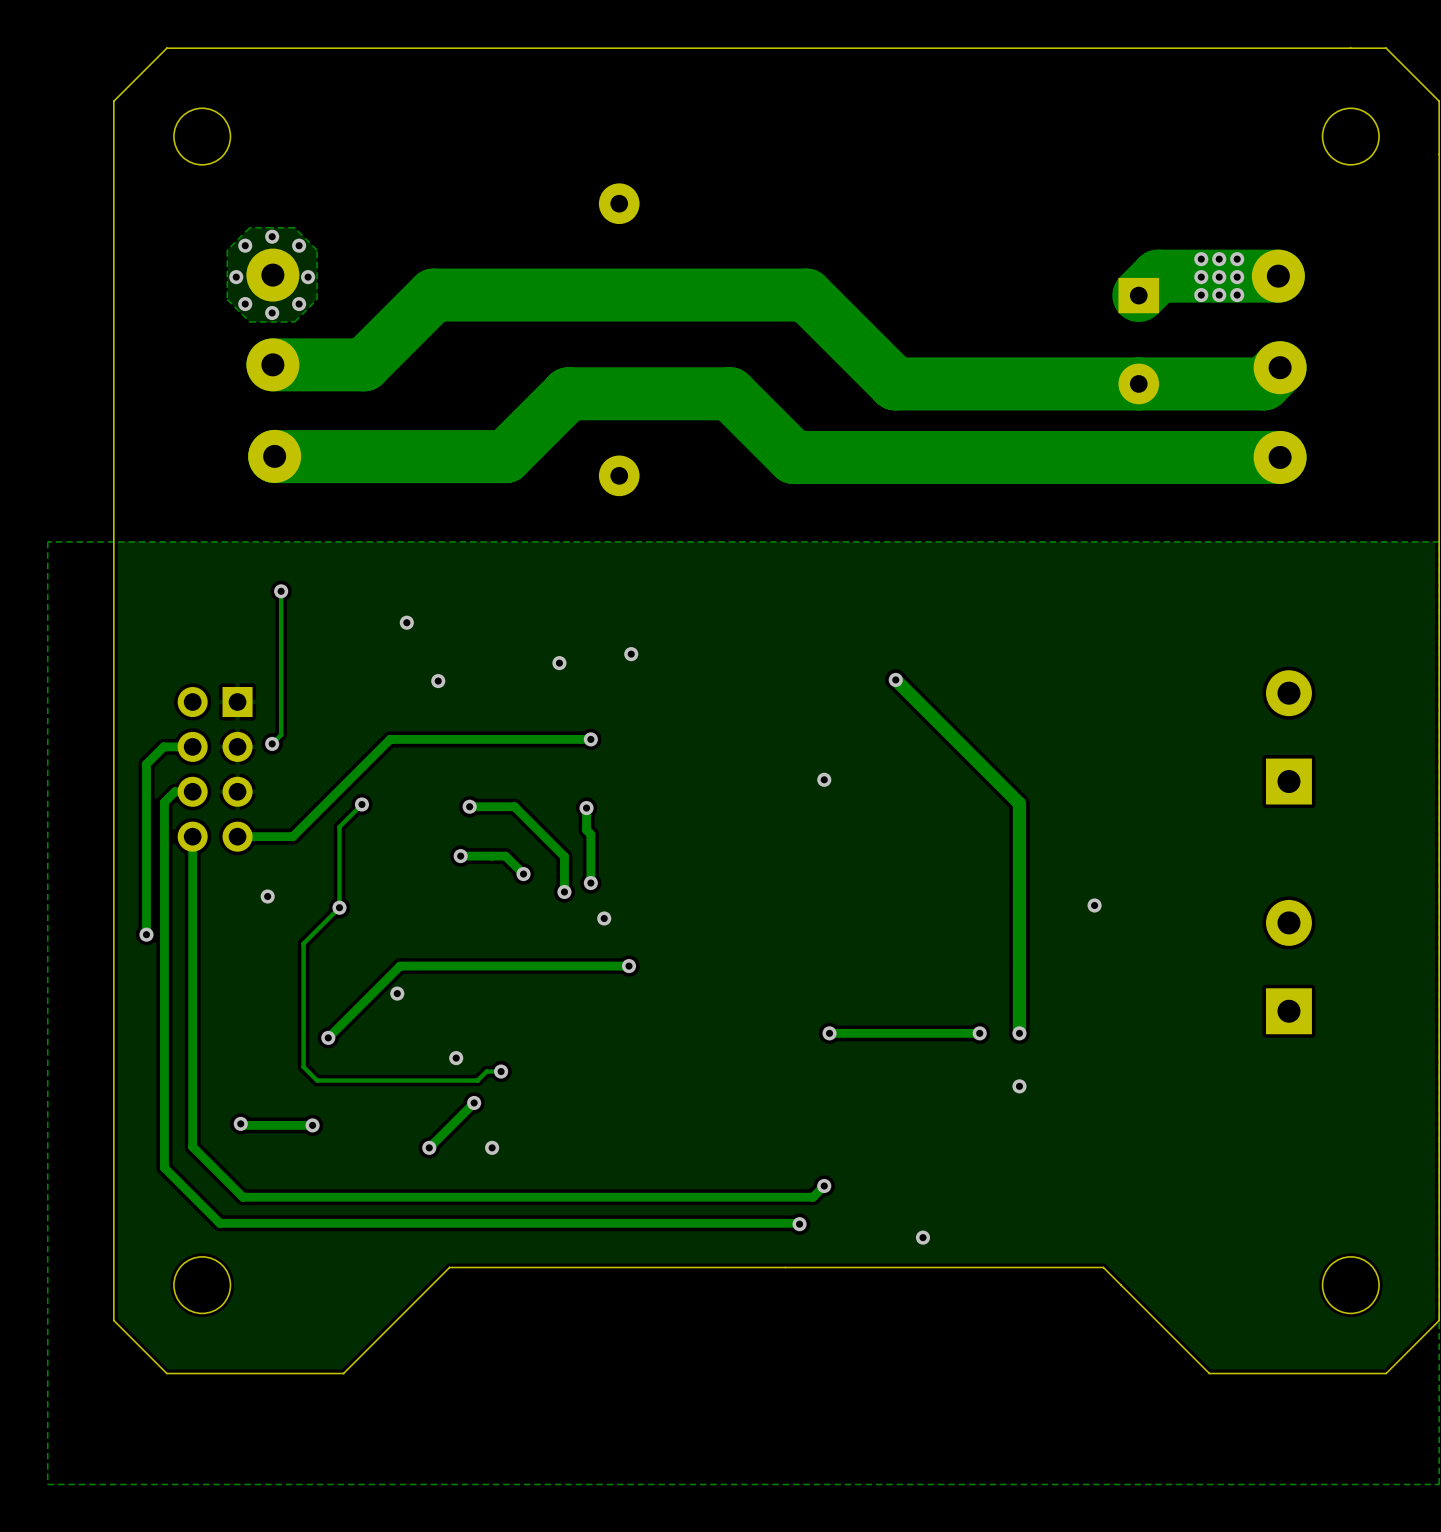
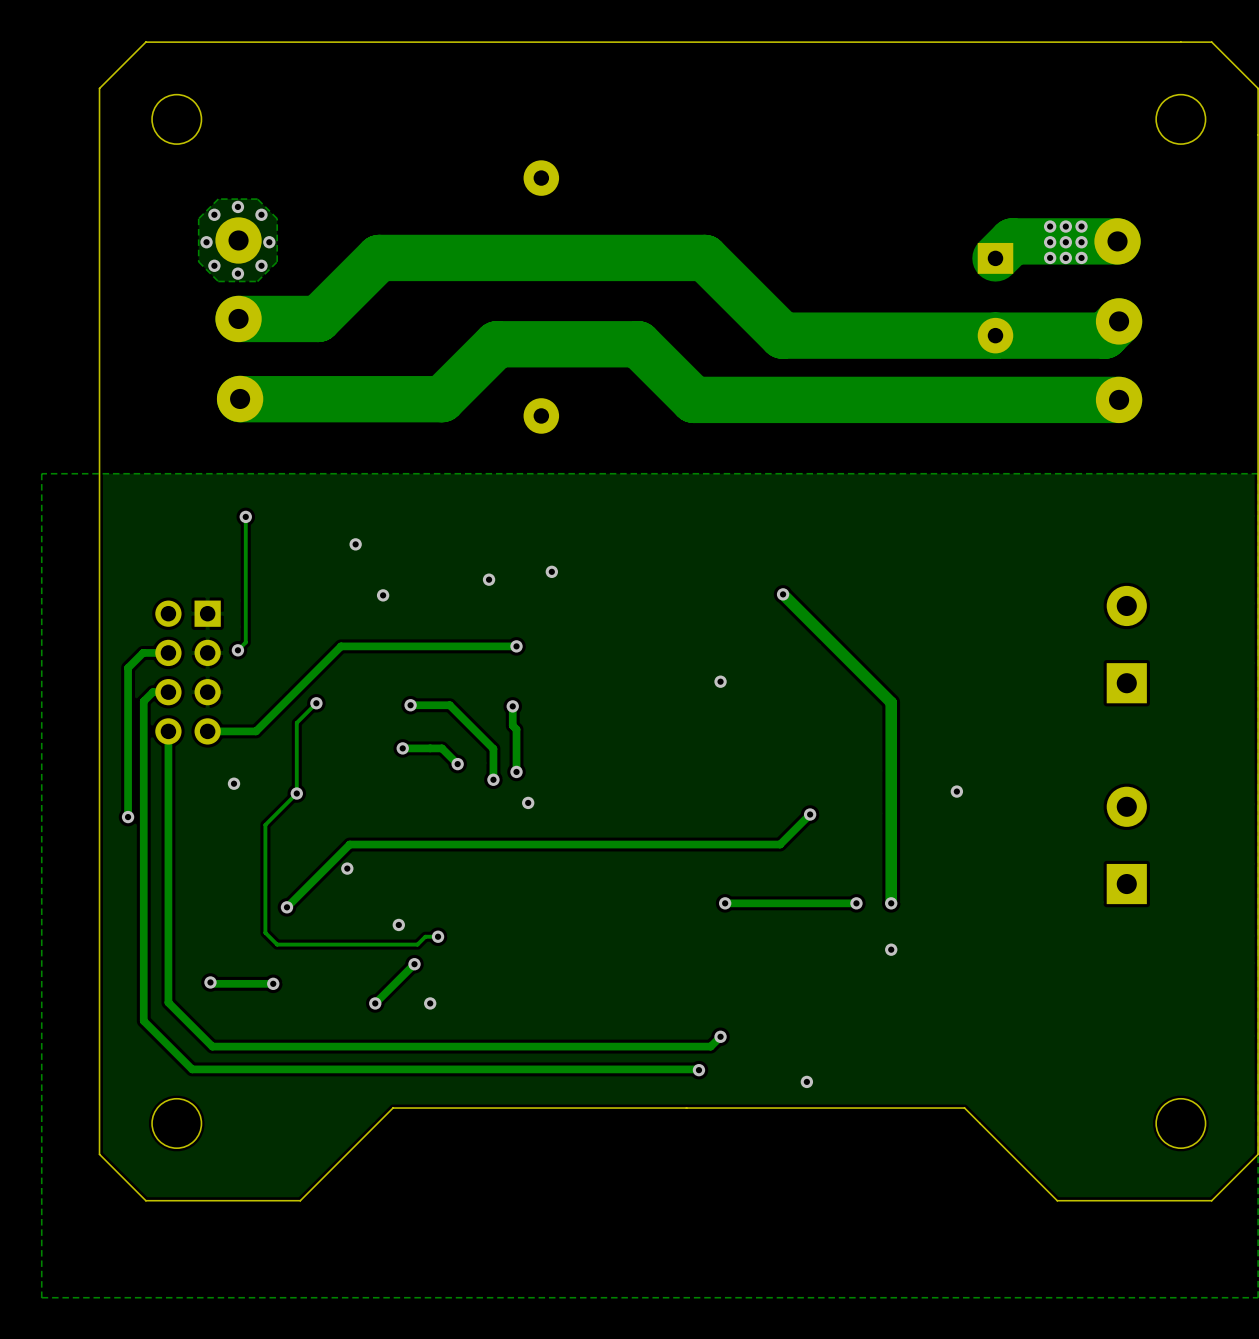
track: none -> (810, 814) (780, 844) (549, 844)
via: none -> (810, 814)
via: (629, 966) -> none

